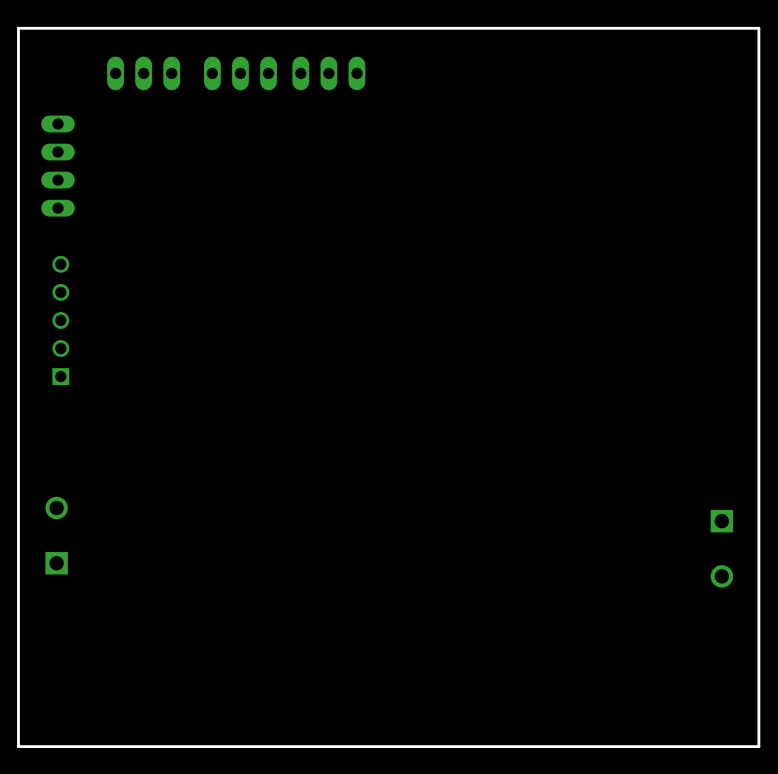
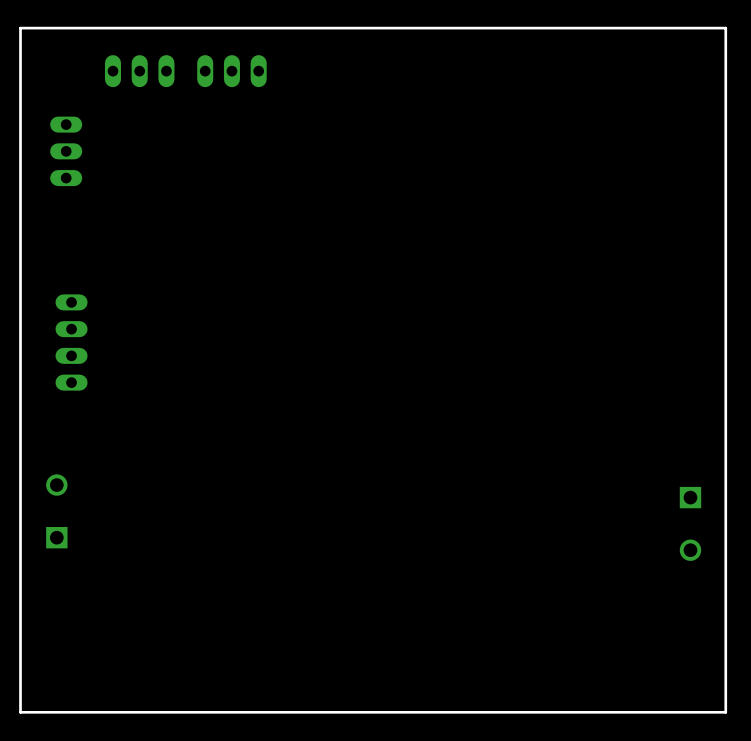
part rotation: 0° (328, 73) -> 90° clockwise (66, 151)
part position: (328, 73) -> (66, 151)
part position: (58, 166) -> (71, 342)
part: (60, 320) -> none

